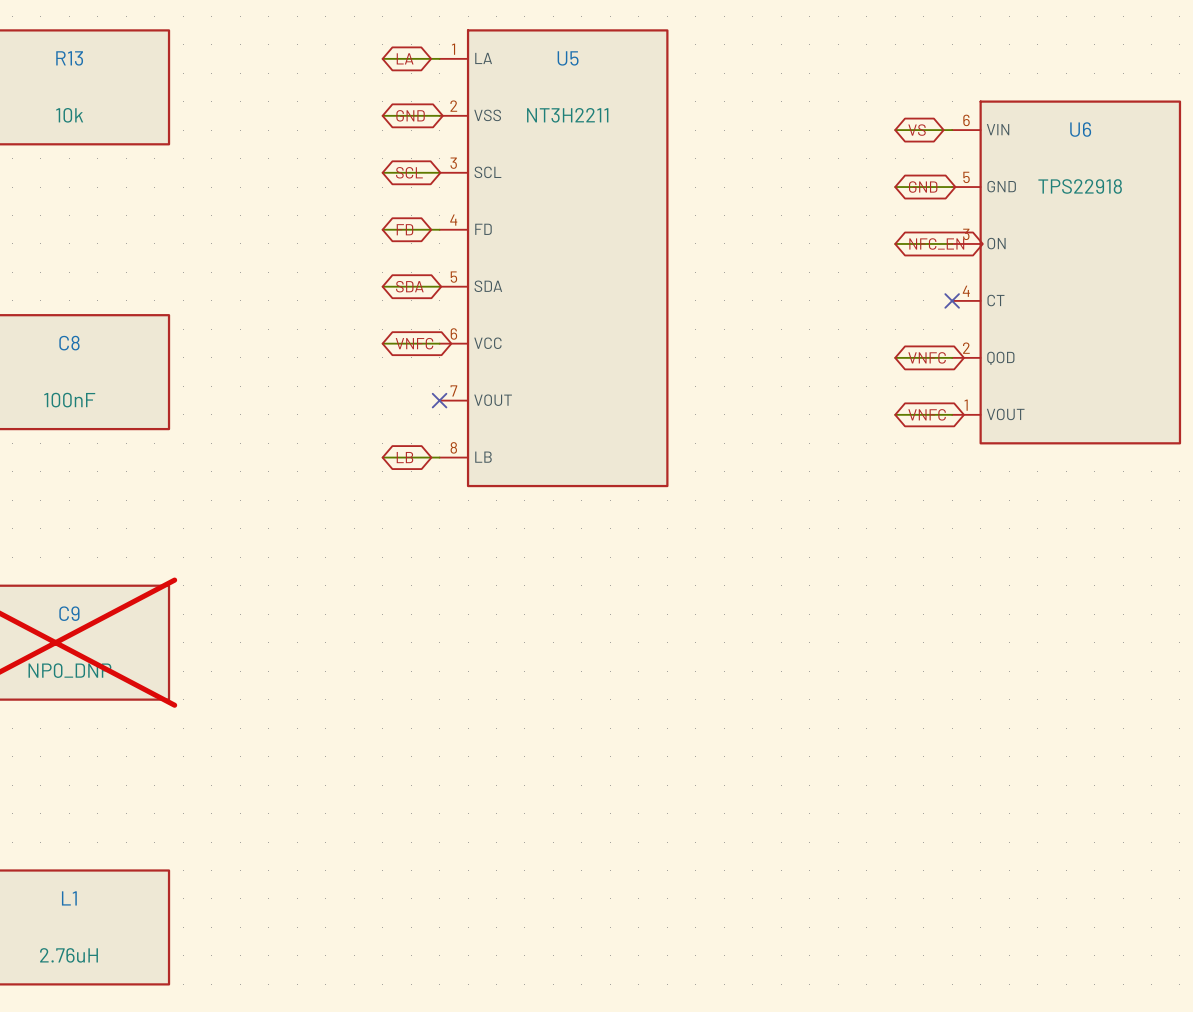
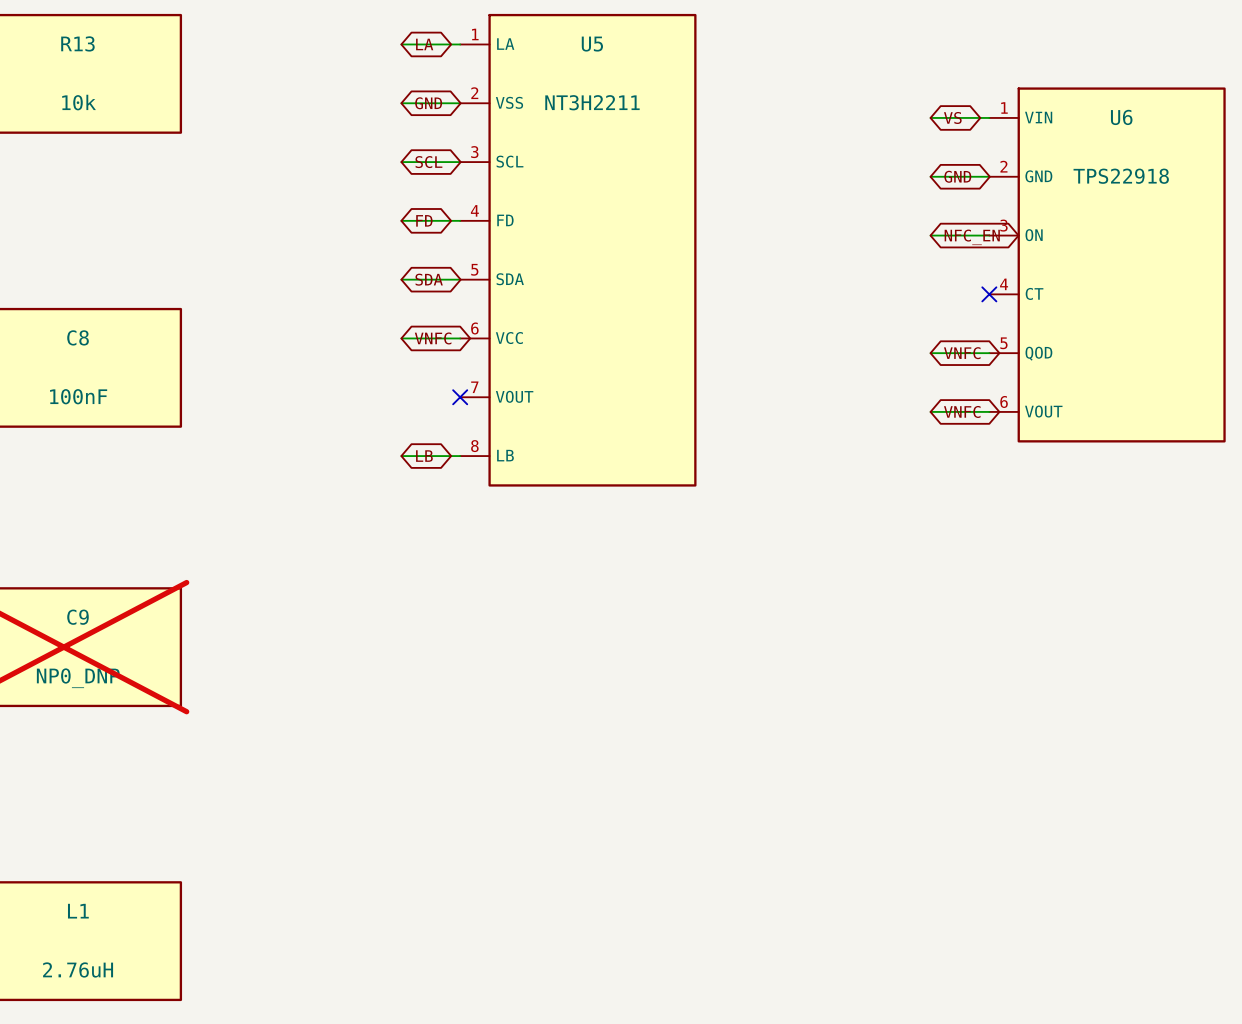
U6 pin number: 6 (966, 120) -> 1 (1004, 107)
U6 pin number: 5 (966, 177) -> 2 (1003, 166)
U6 pin number: 2 (966, 348) -> 5 (1003, 343)
U6 pin number: 1 (966, 405) -> 6 (1004, 401)

